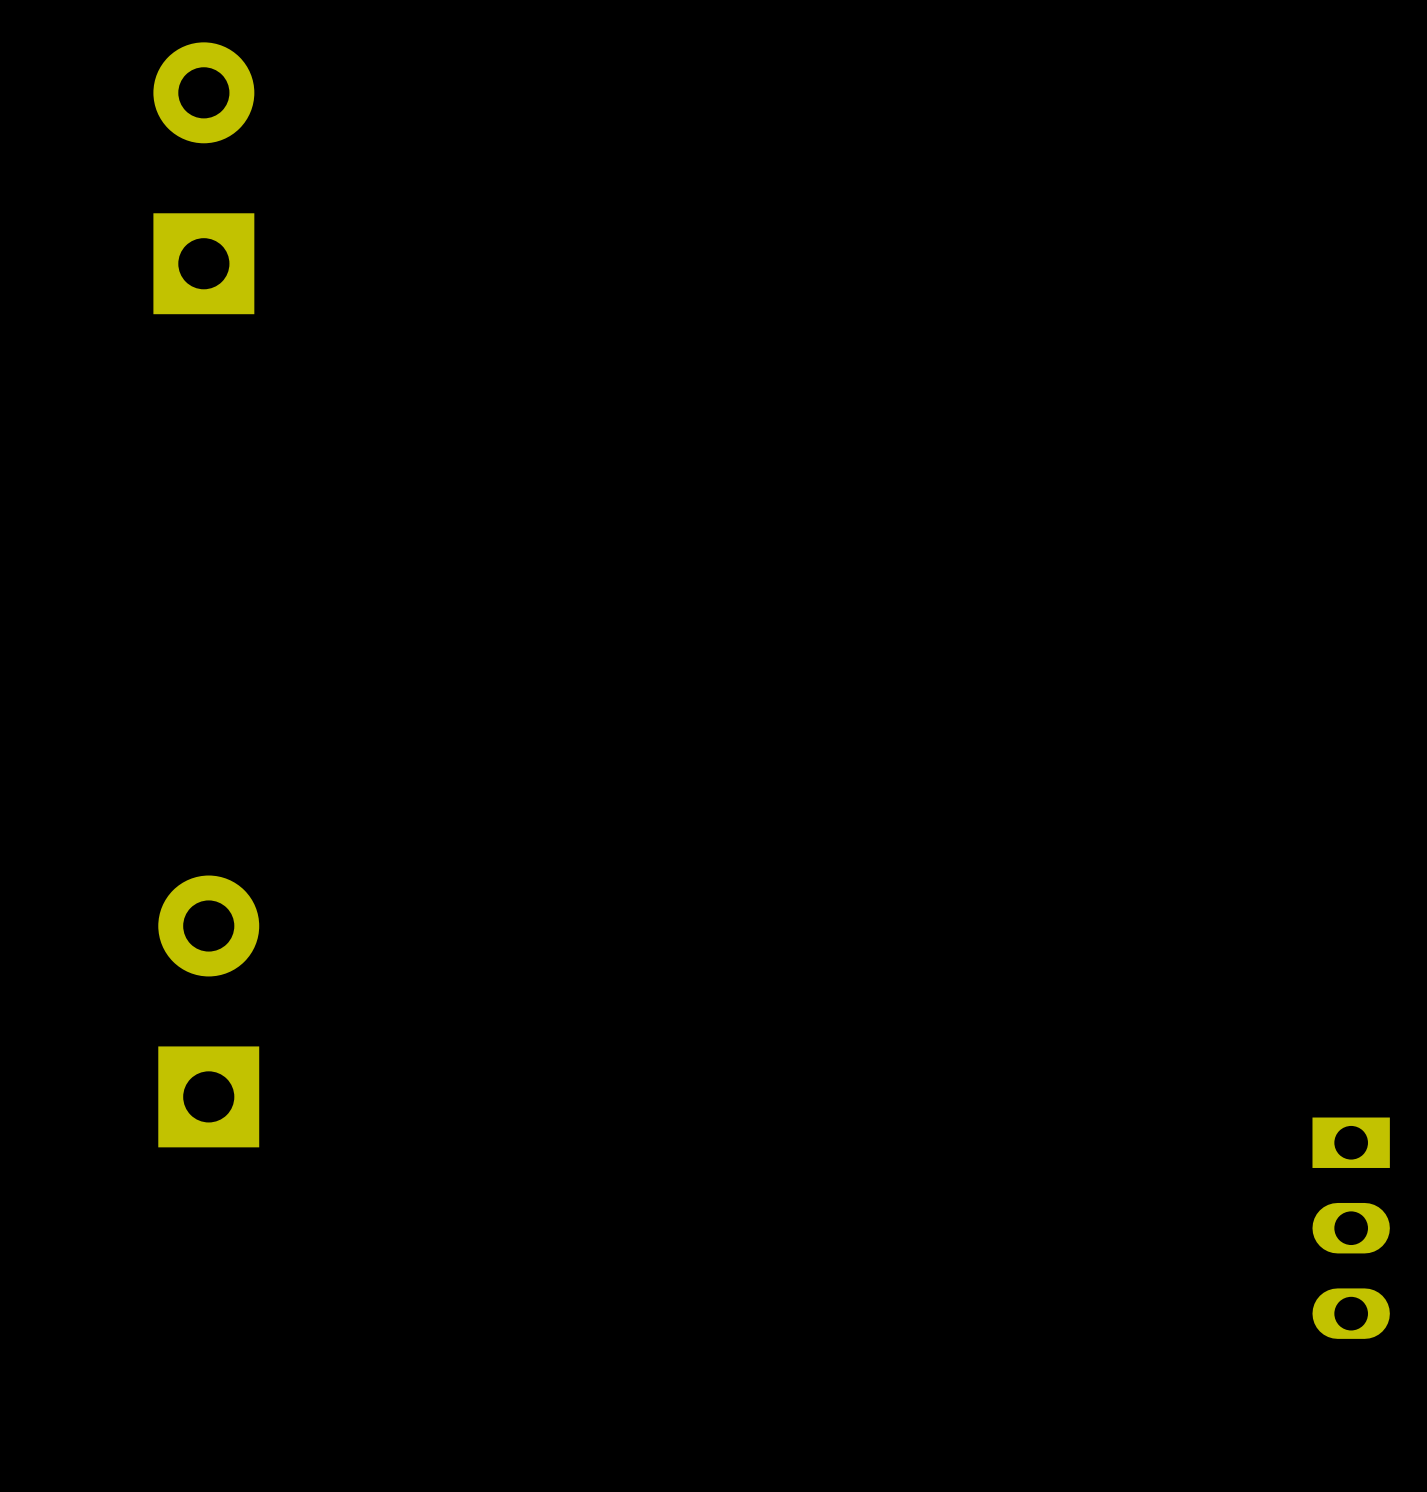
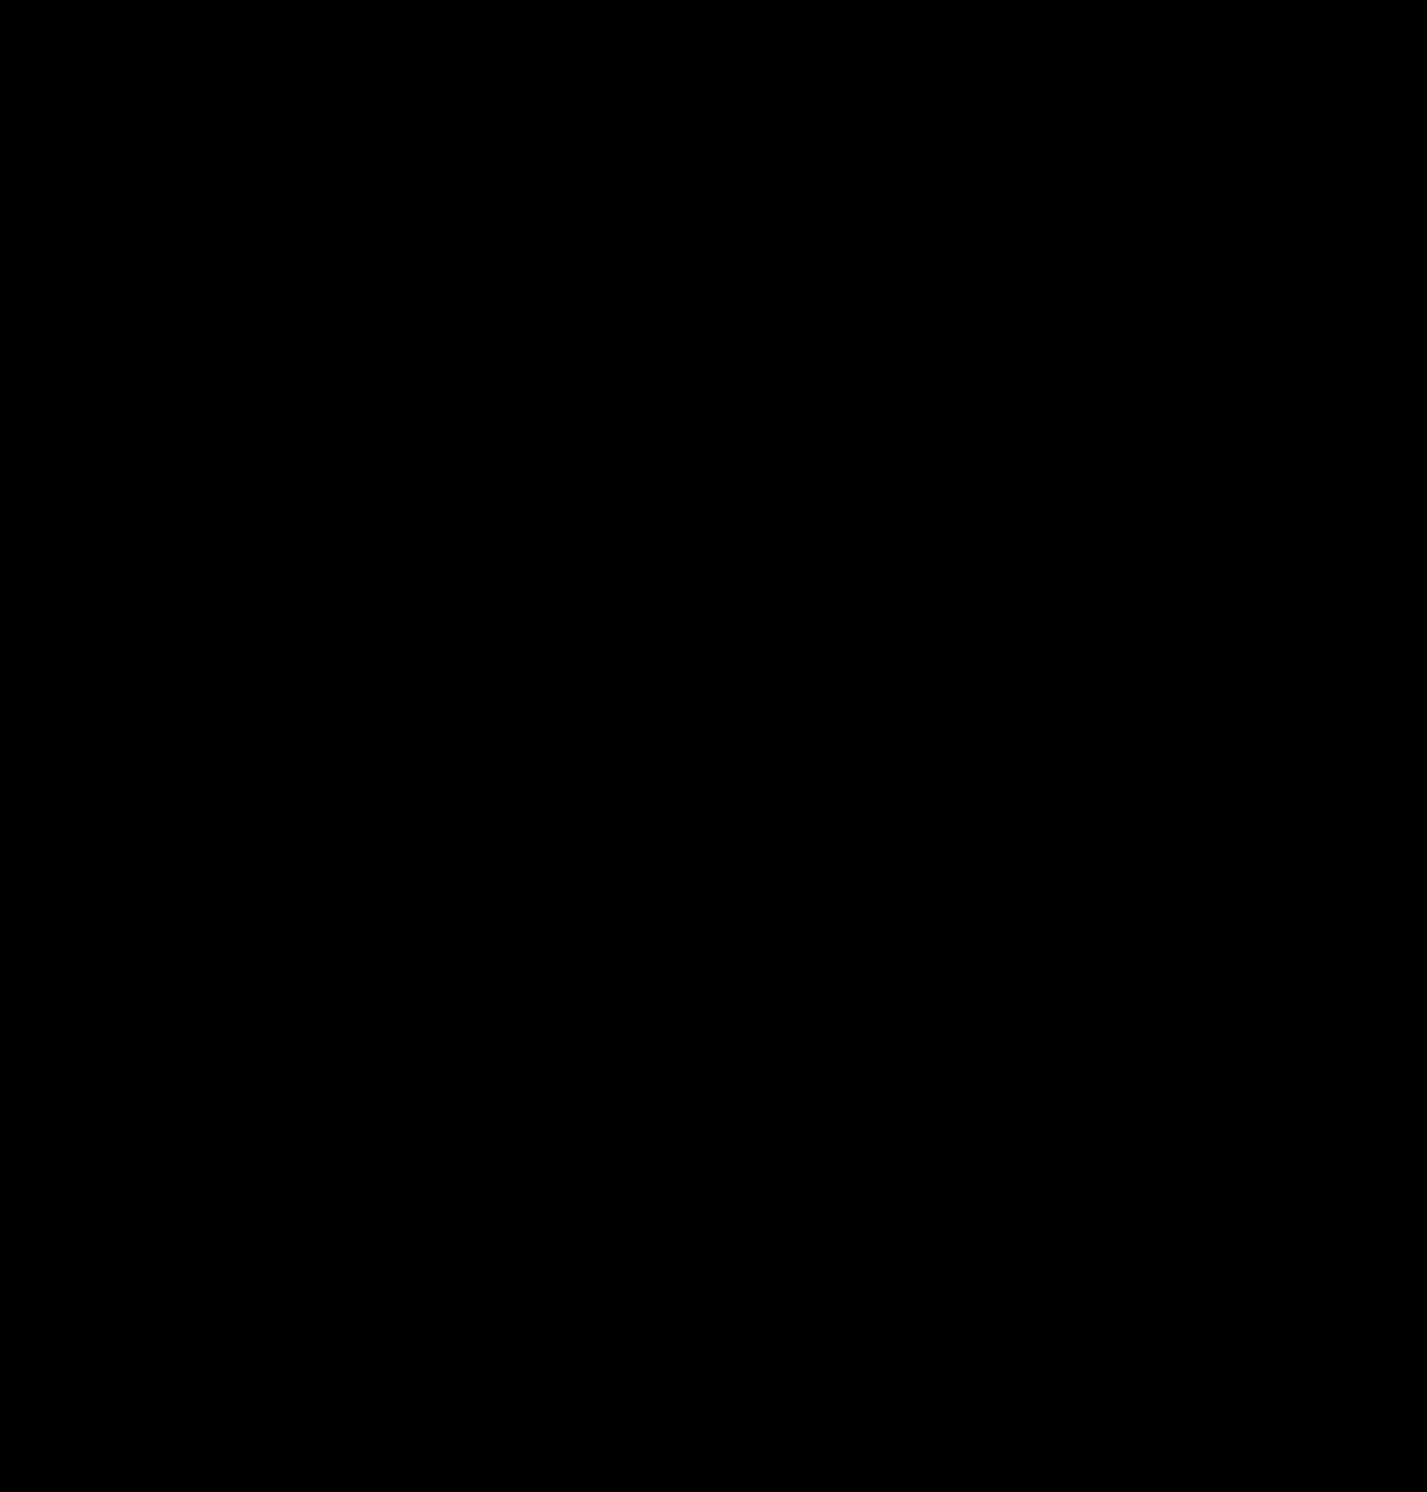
part: (203, 178) -> none
part: (208, 1011) -> none
part: (1351, 1228) -> none

